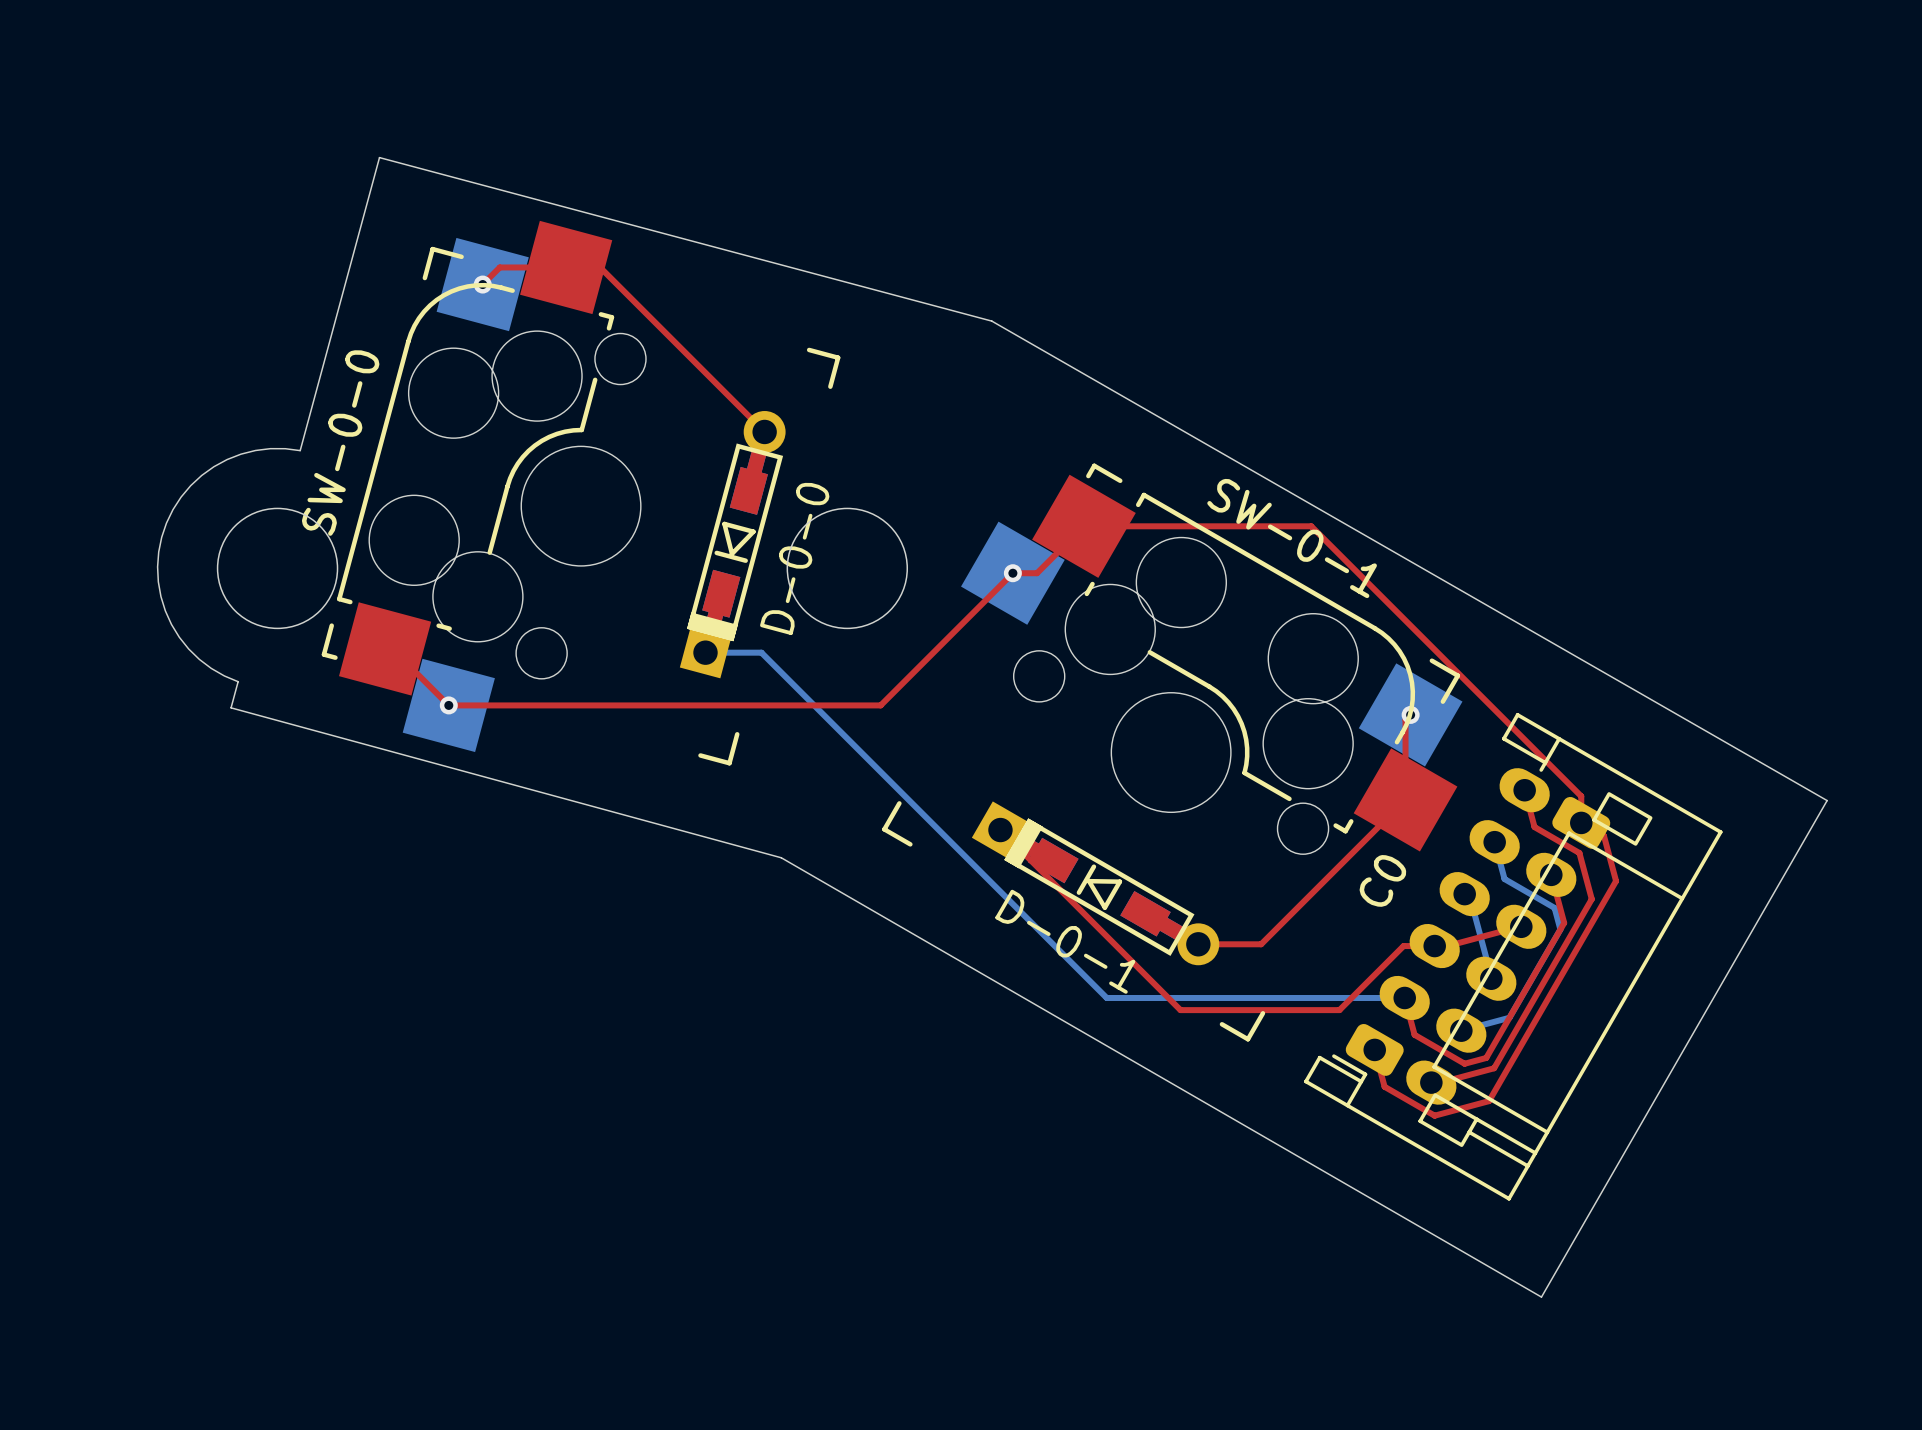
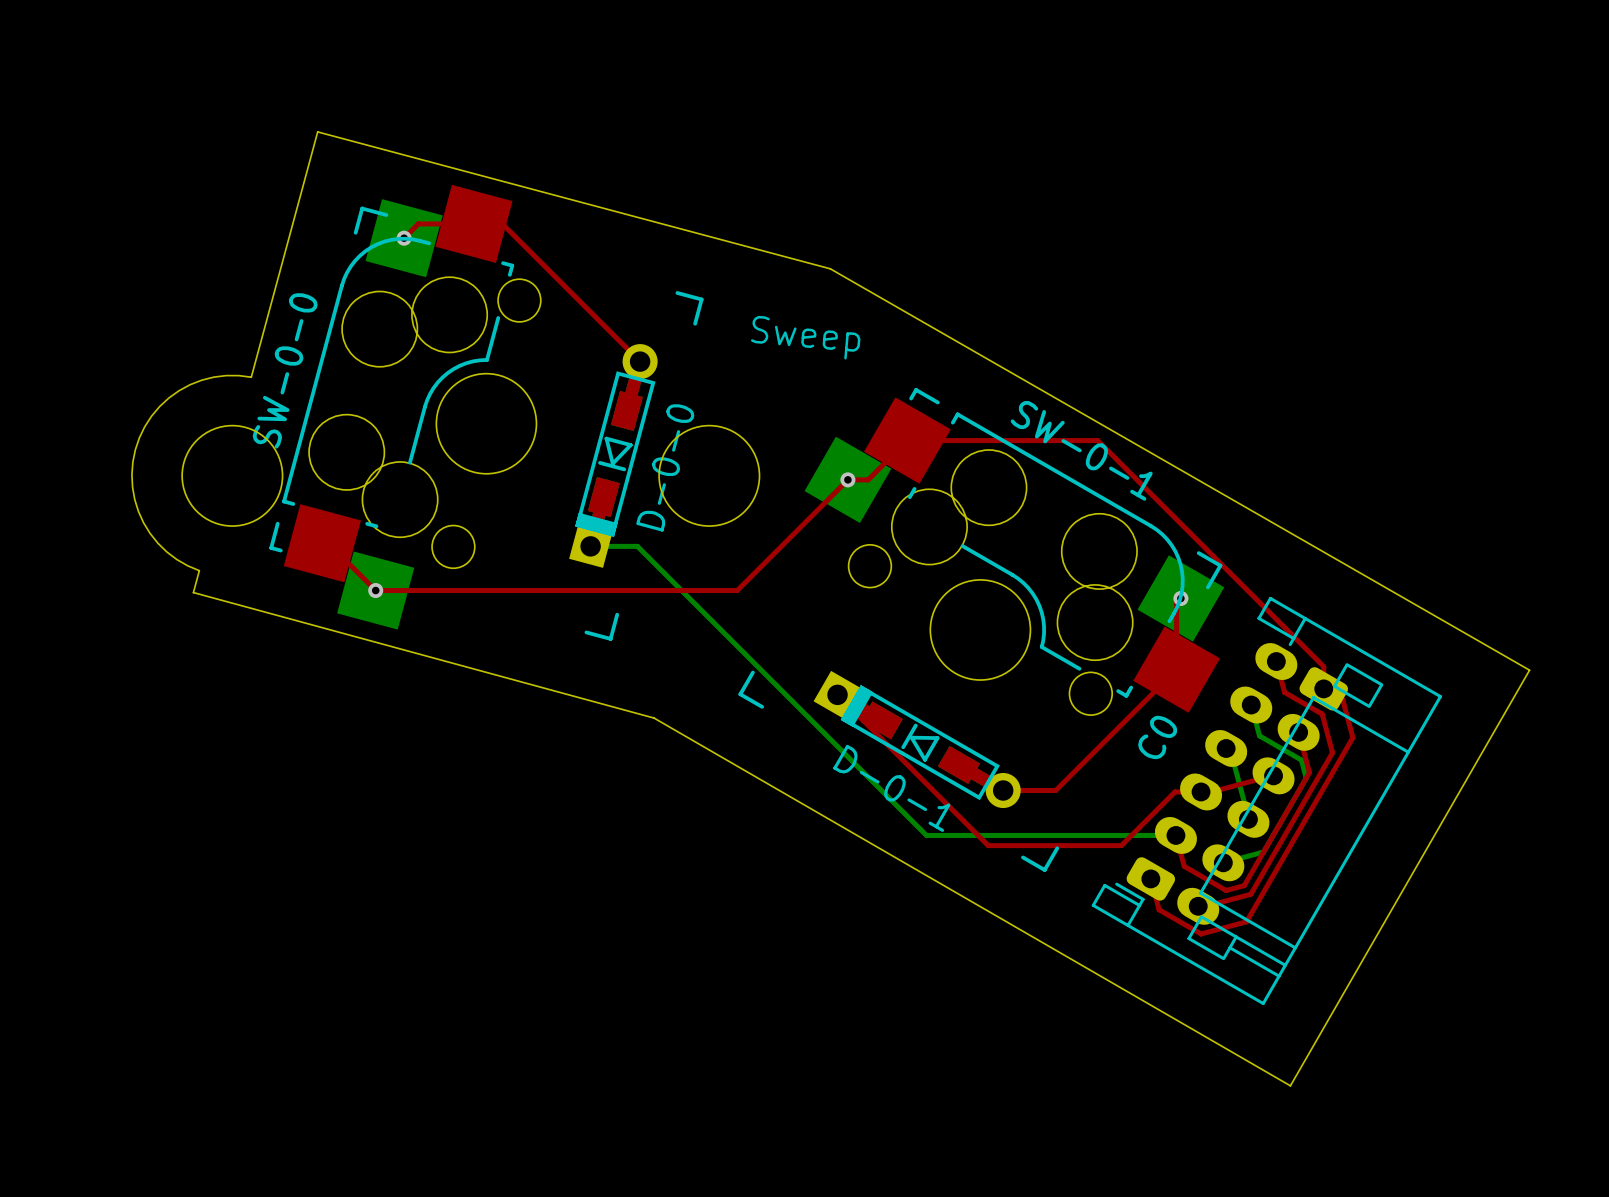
text: none -> Sweep (805, 337)

